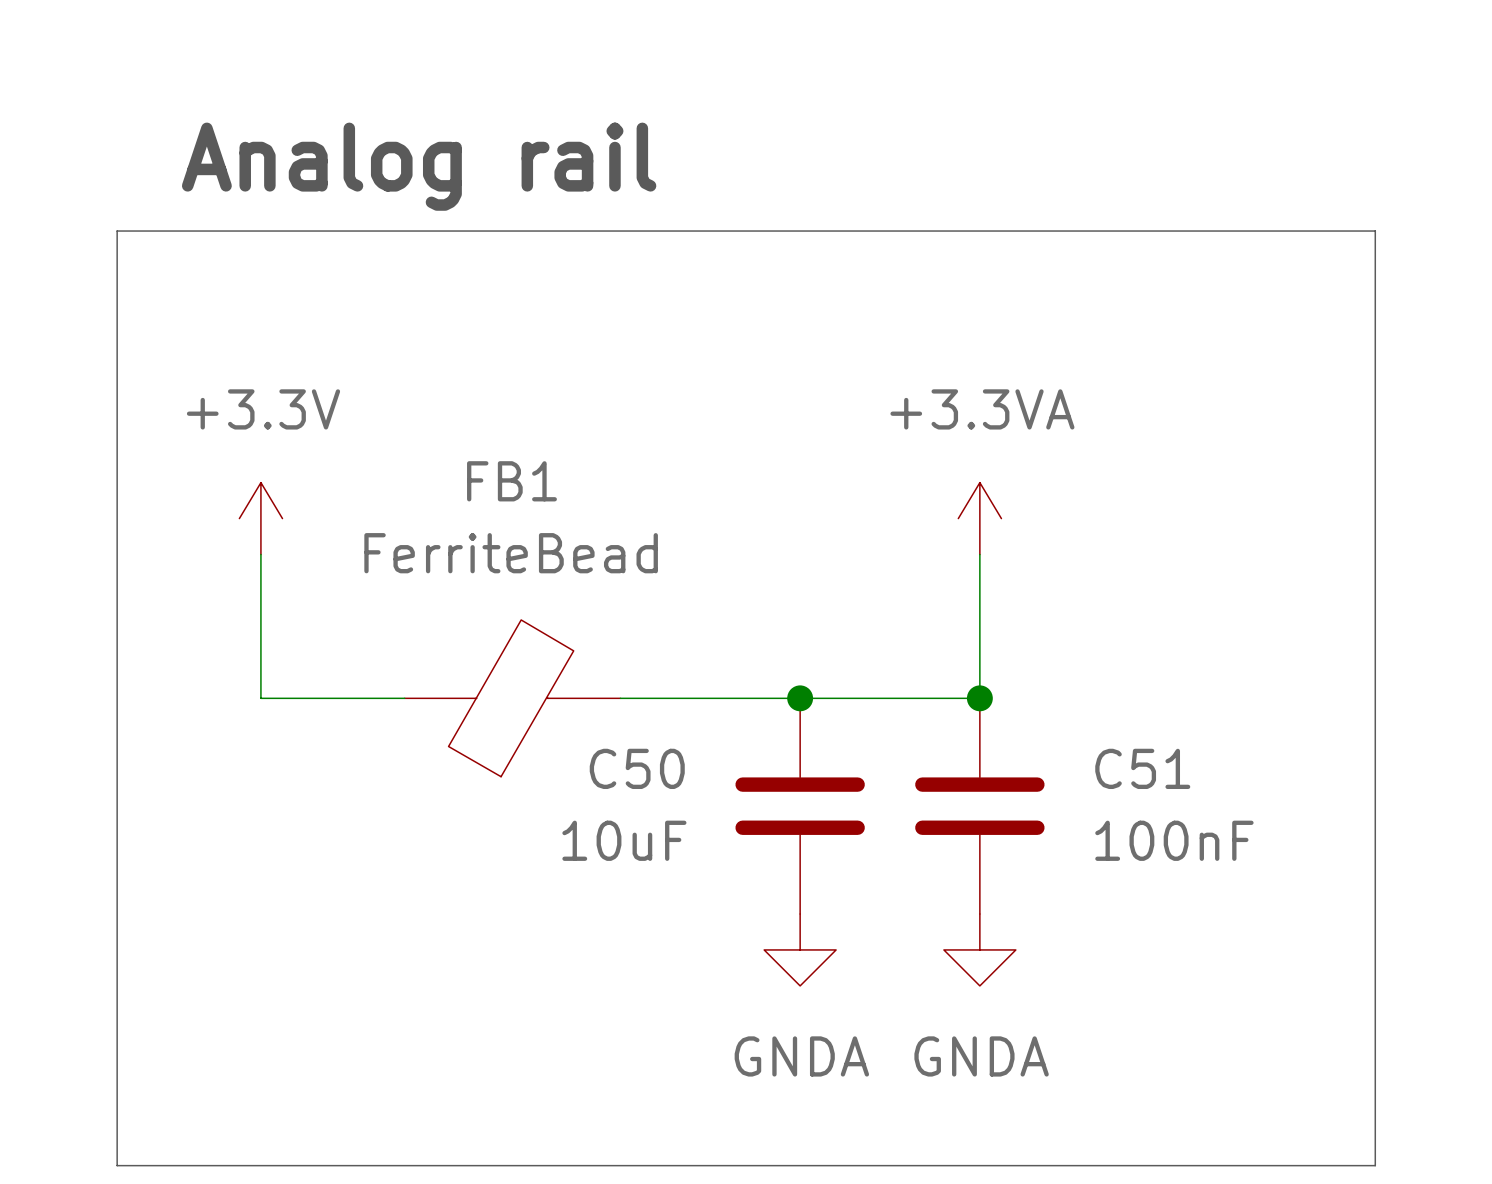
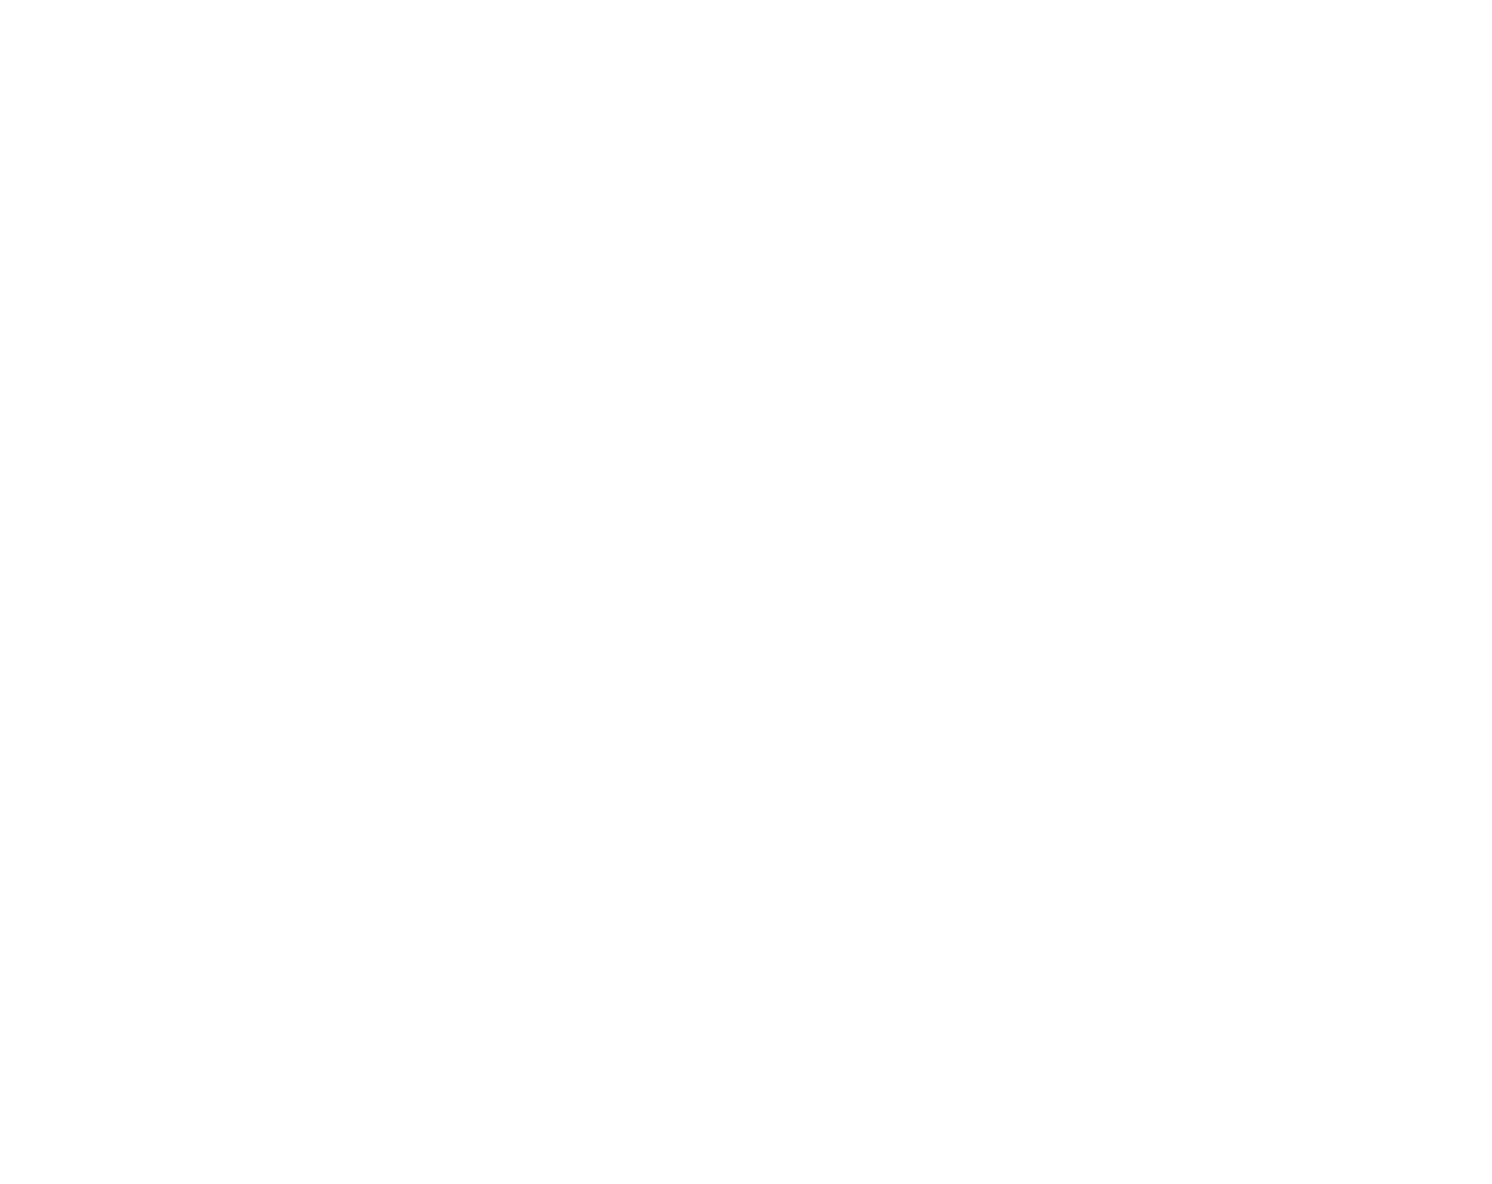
text: Analog rail (419, 166) -> none
line: (117, 231) (1375, 231) (1375, 1165) (117, 1165) (117, 231) -> none
power symbol: +3.3V (260, 518) -> none
power symbol: +3.3VA (979, 518) -> none
wire: (260, 554) (260, 698) (404, 698) -> none
wire: (979, 554) (979, 698) (620, 698) -> none
FB1: FerriteBead (512, 698) -> none
junction: (800, 698) -> none
junction: (979, 698) -> none
C50: 10uF (800, 806) -> none
C51: 100nF (979, 806) -> none
power symbol: GNDA (800, 949) -> none
power symbol: GNDA (979, 949) -> none

